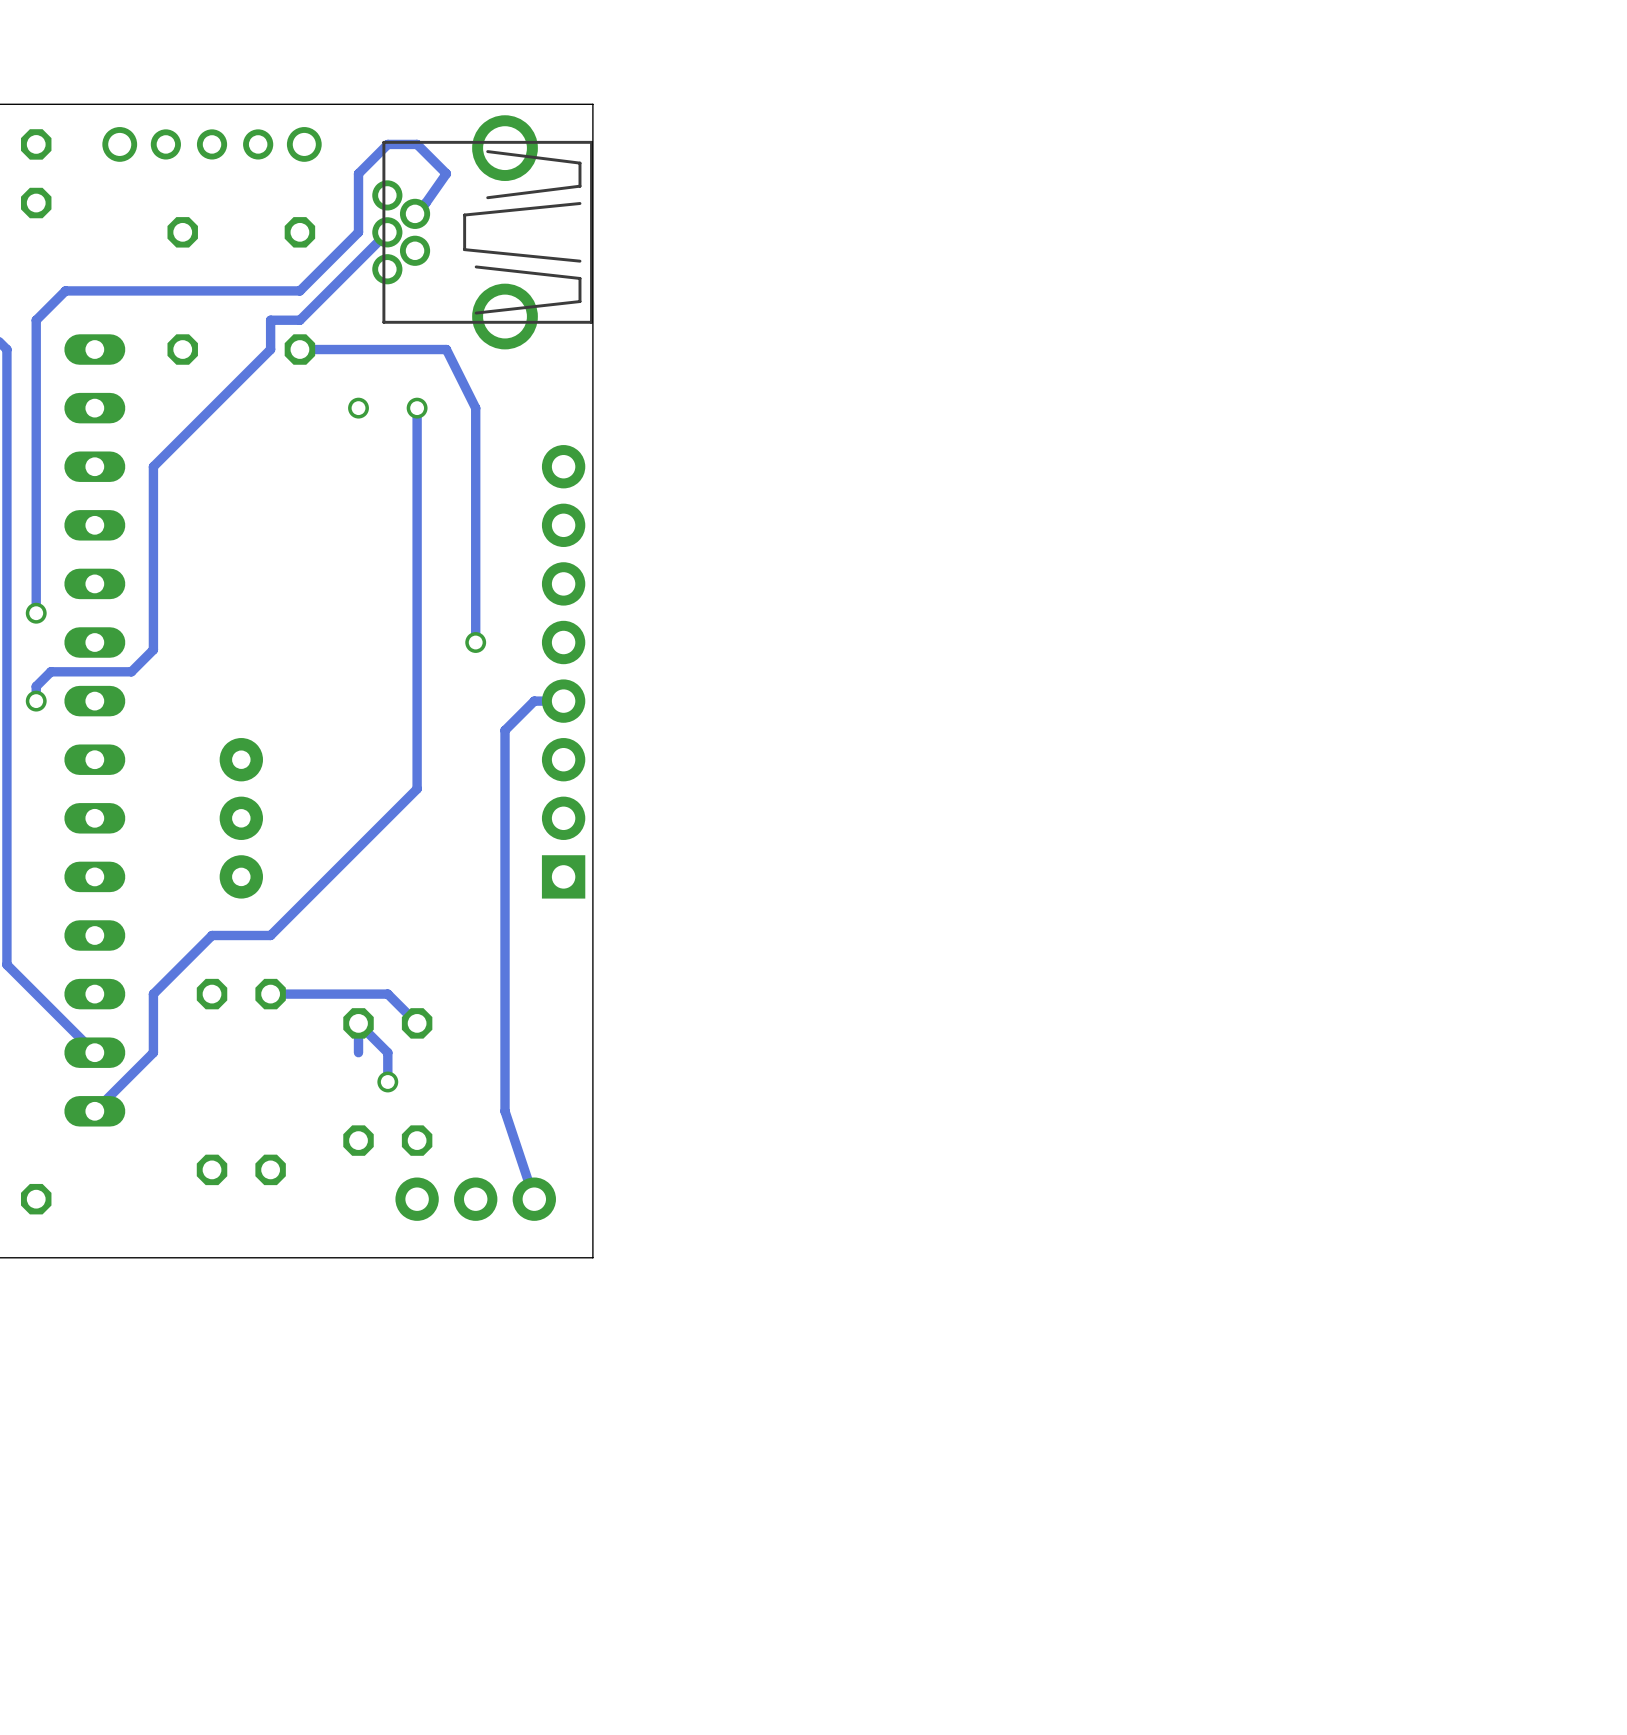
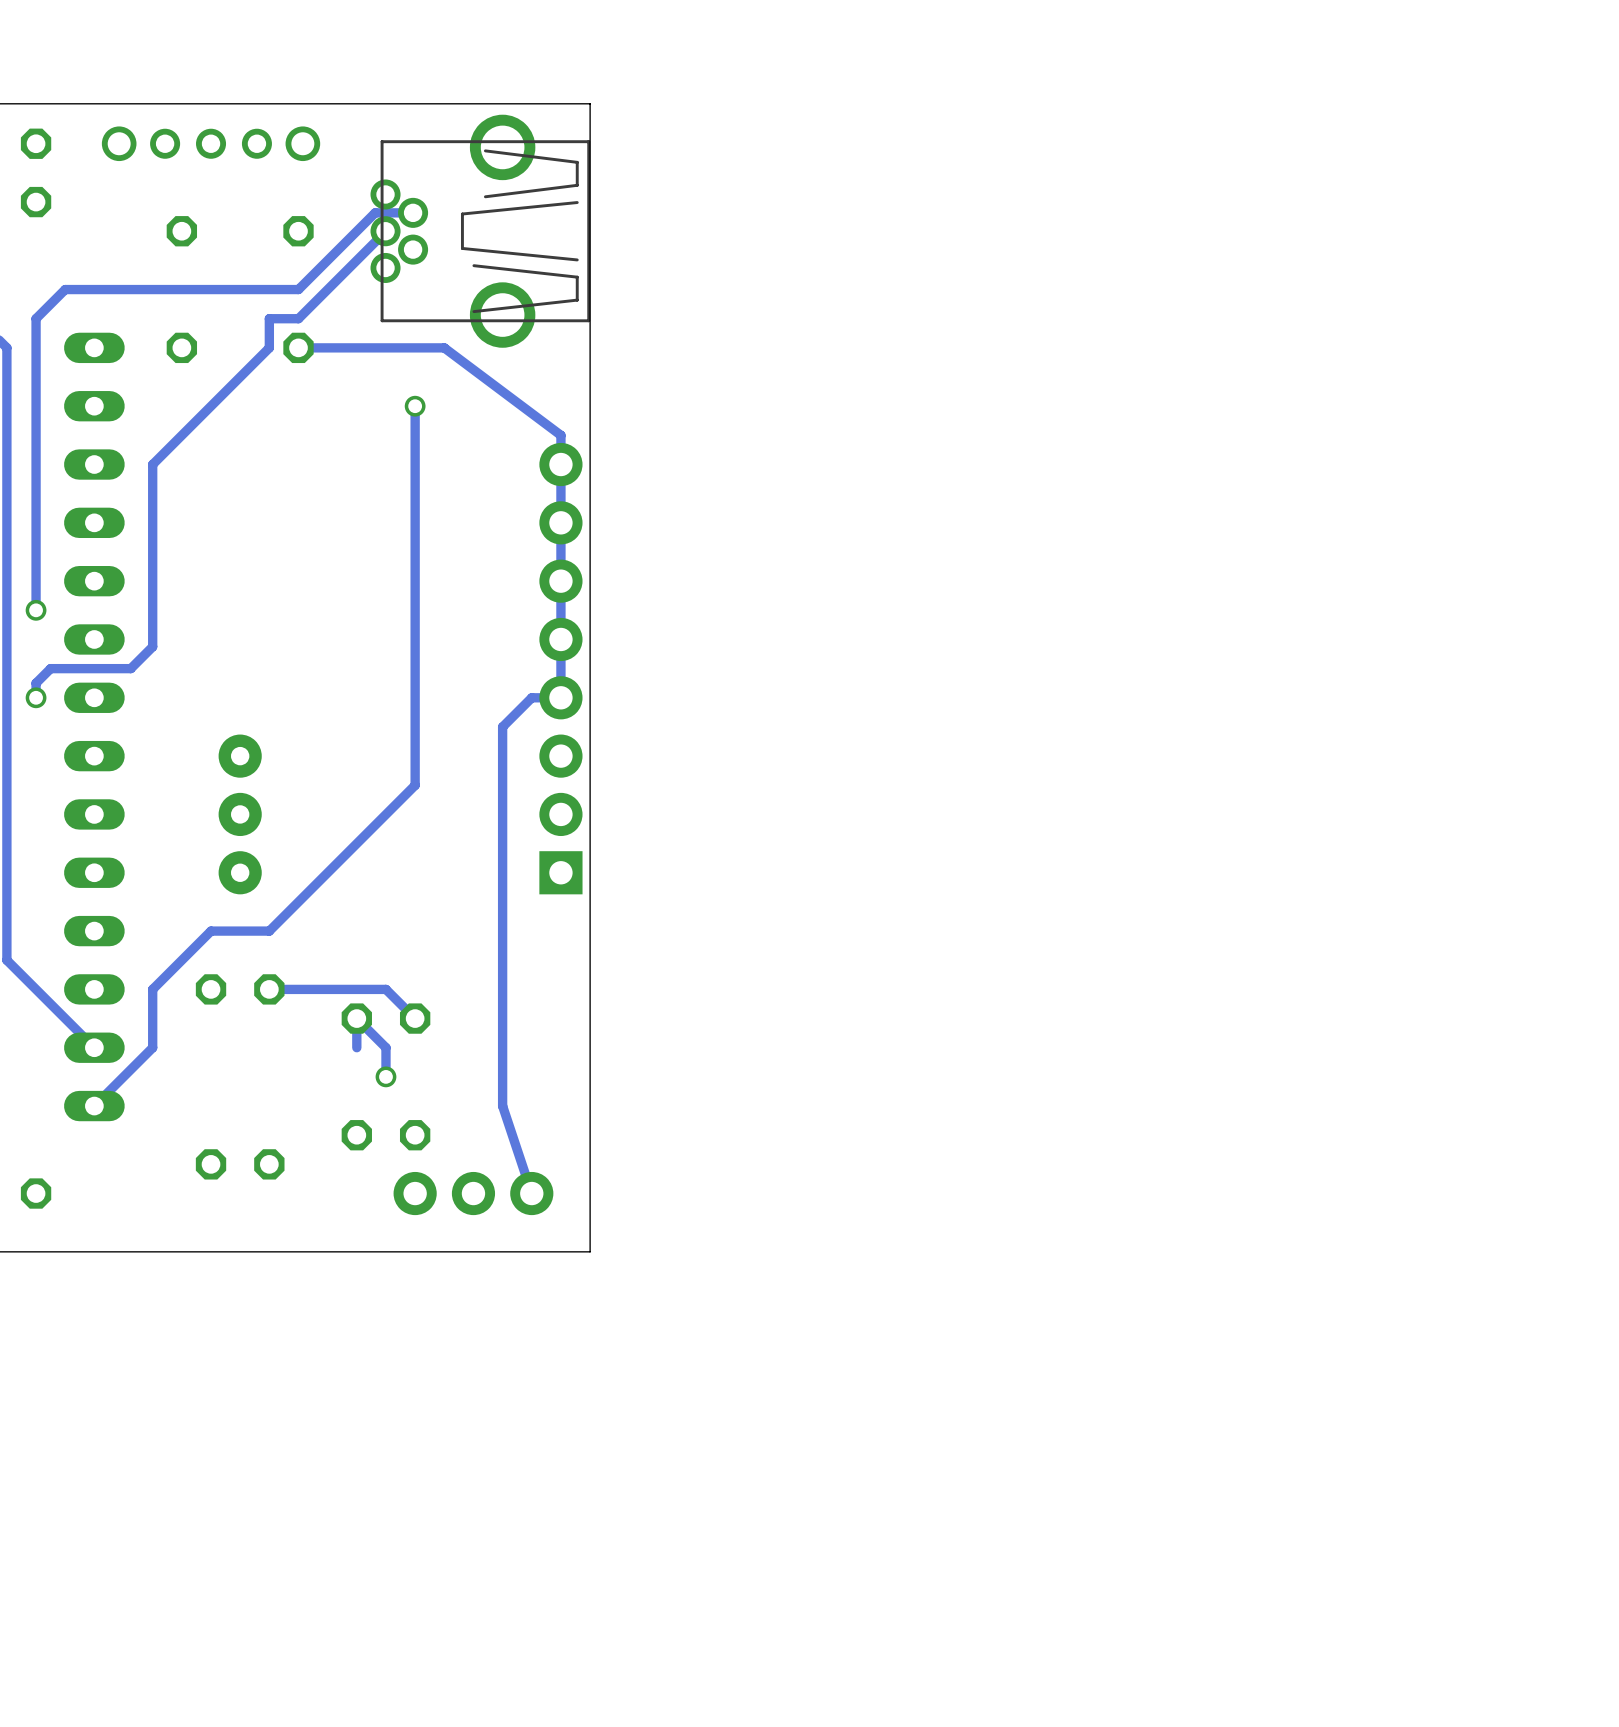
track: (415, 213) (425, 203) (446, 173) (417, 144) (387, 144) (358, 173) (358, 232) -> (413, 212) (375, 212) (356, 231)
track: (446, 349) (475, 408) (475, 642) -> (444, 347) (560, 435) (560, 697)
via: (358, 408) -> none
via: (475, 642) -> none

